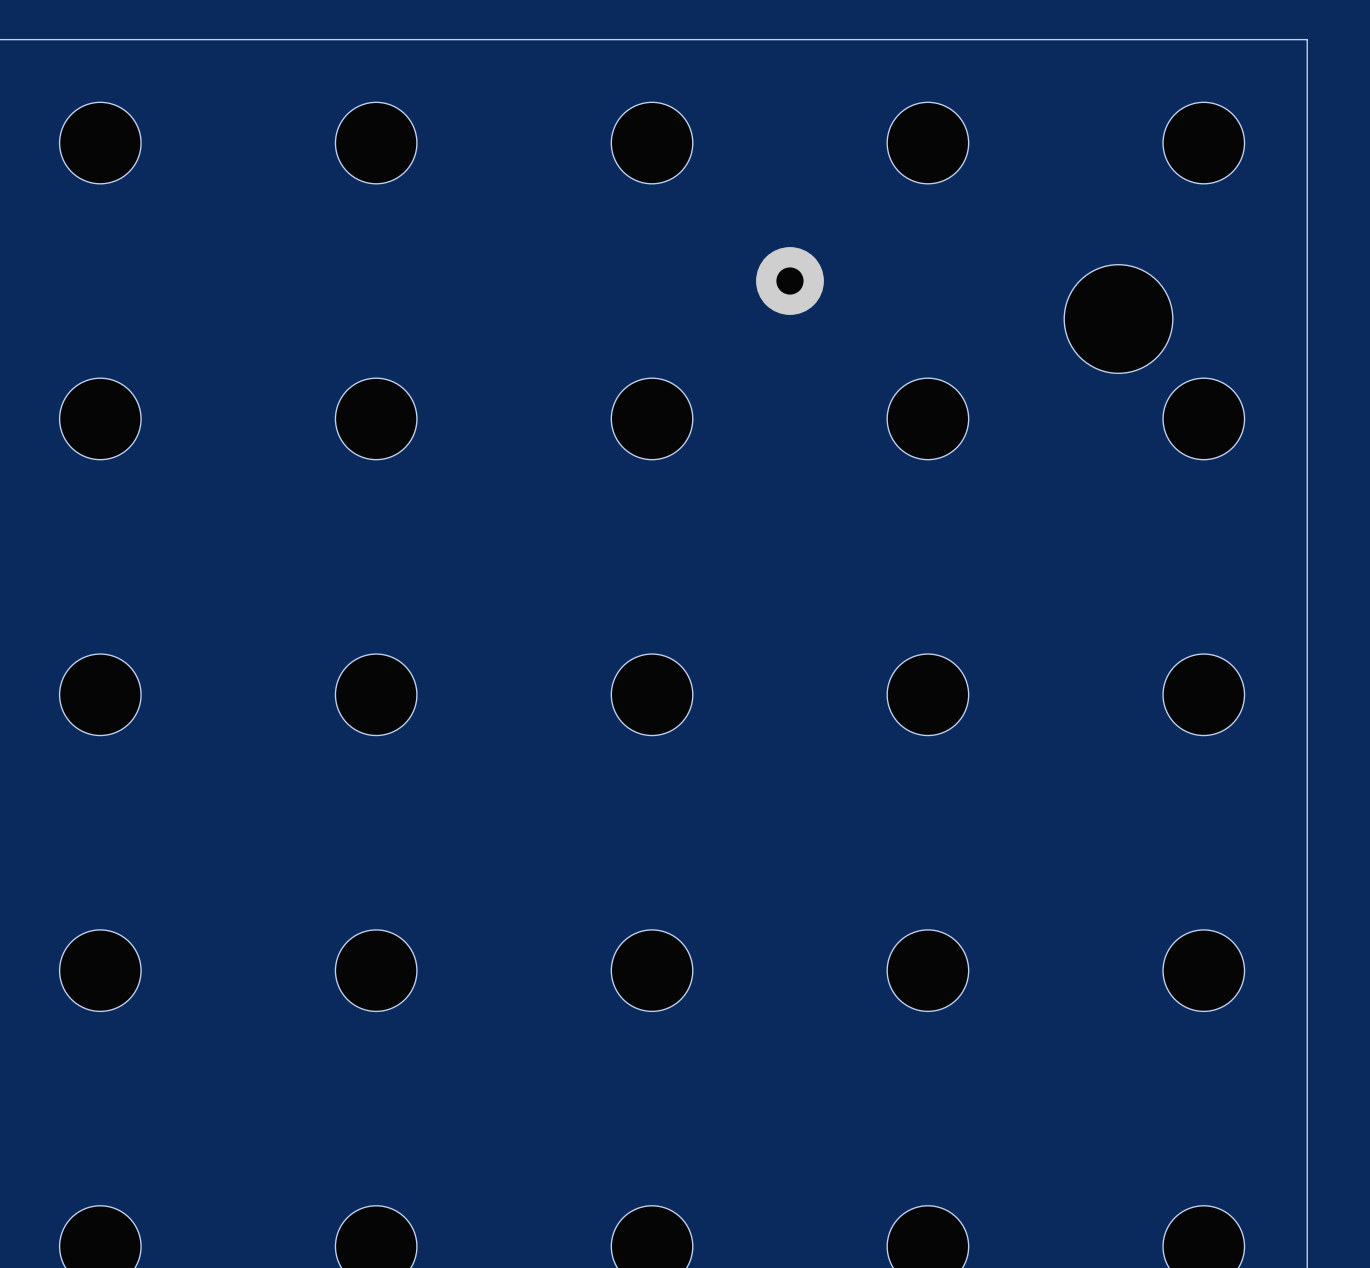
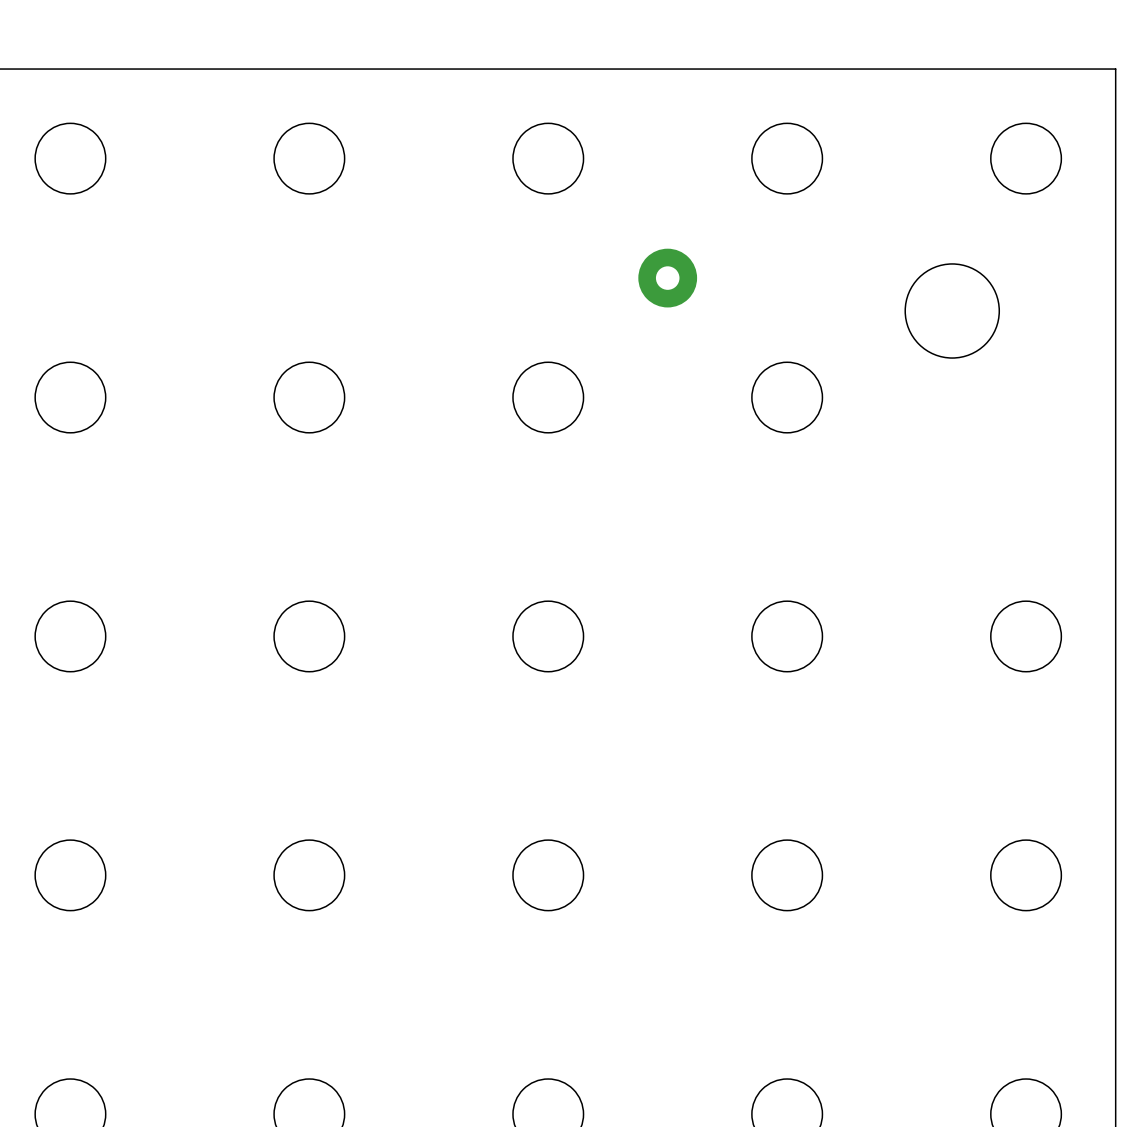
part: (1203, 418) -> none

